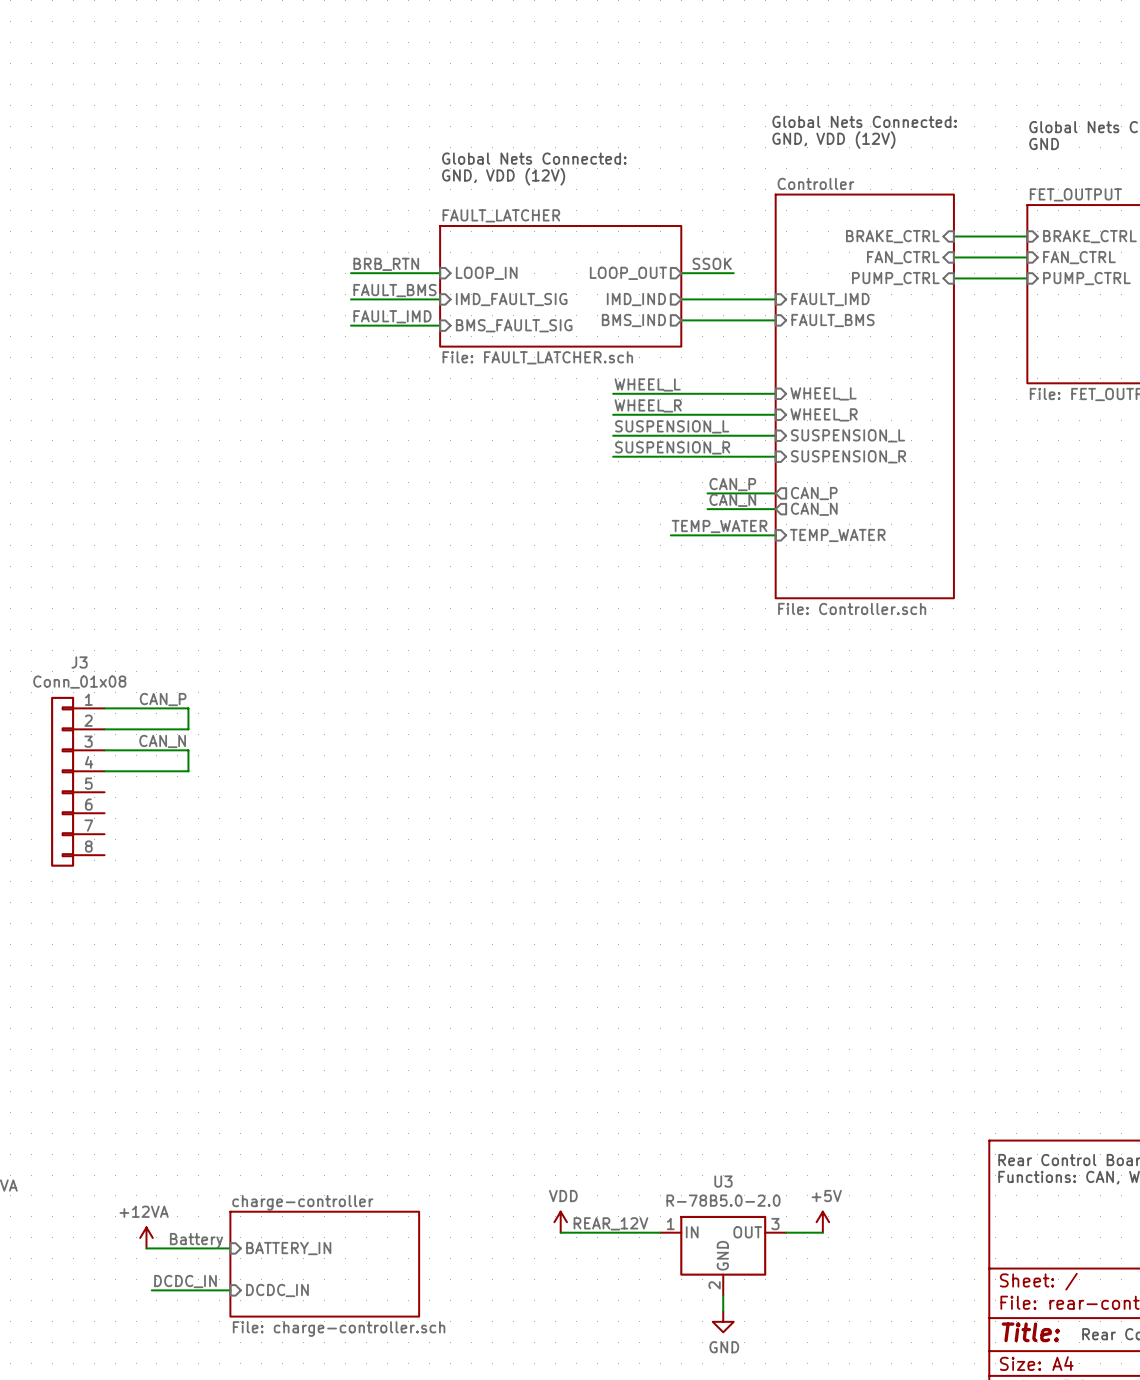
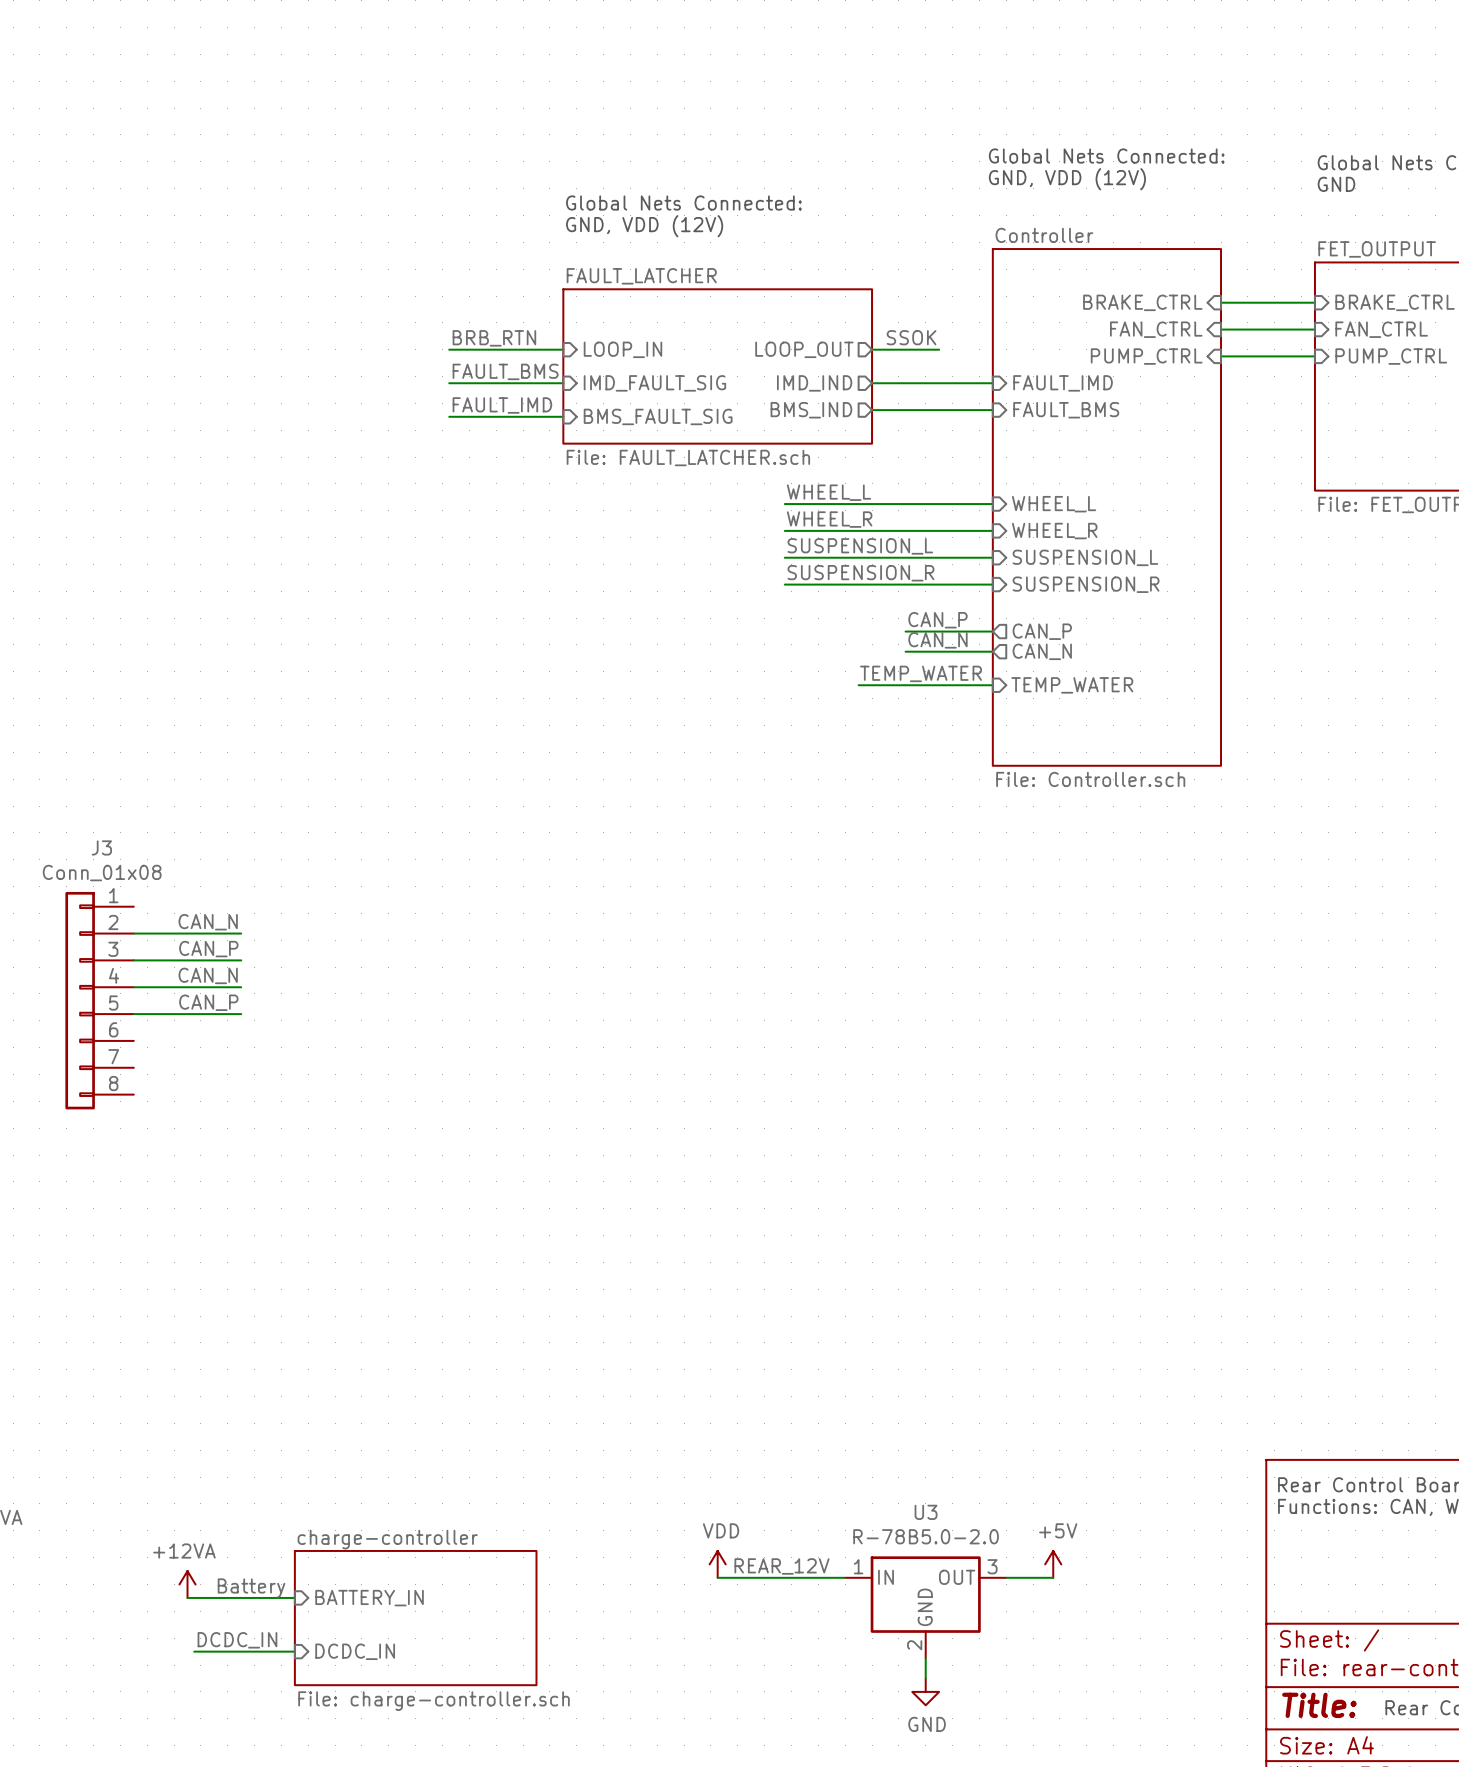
label position: CAN_P (163, 699) -> CAN_P (208, 1002)
wire: (104, 708) (188, 708) (188, 729) -> none
label: none -> CAN_N (208, 922)
label: CAN_N (162, 741) -> CAN_P (208, 949)
wire: (188, 750) (188, 771) -> none
label: none -> CAN_N (208, 975)
wire: none -> (133, 1014) (241, 1014)

